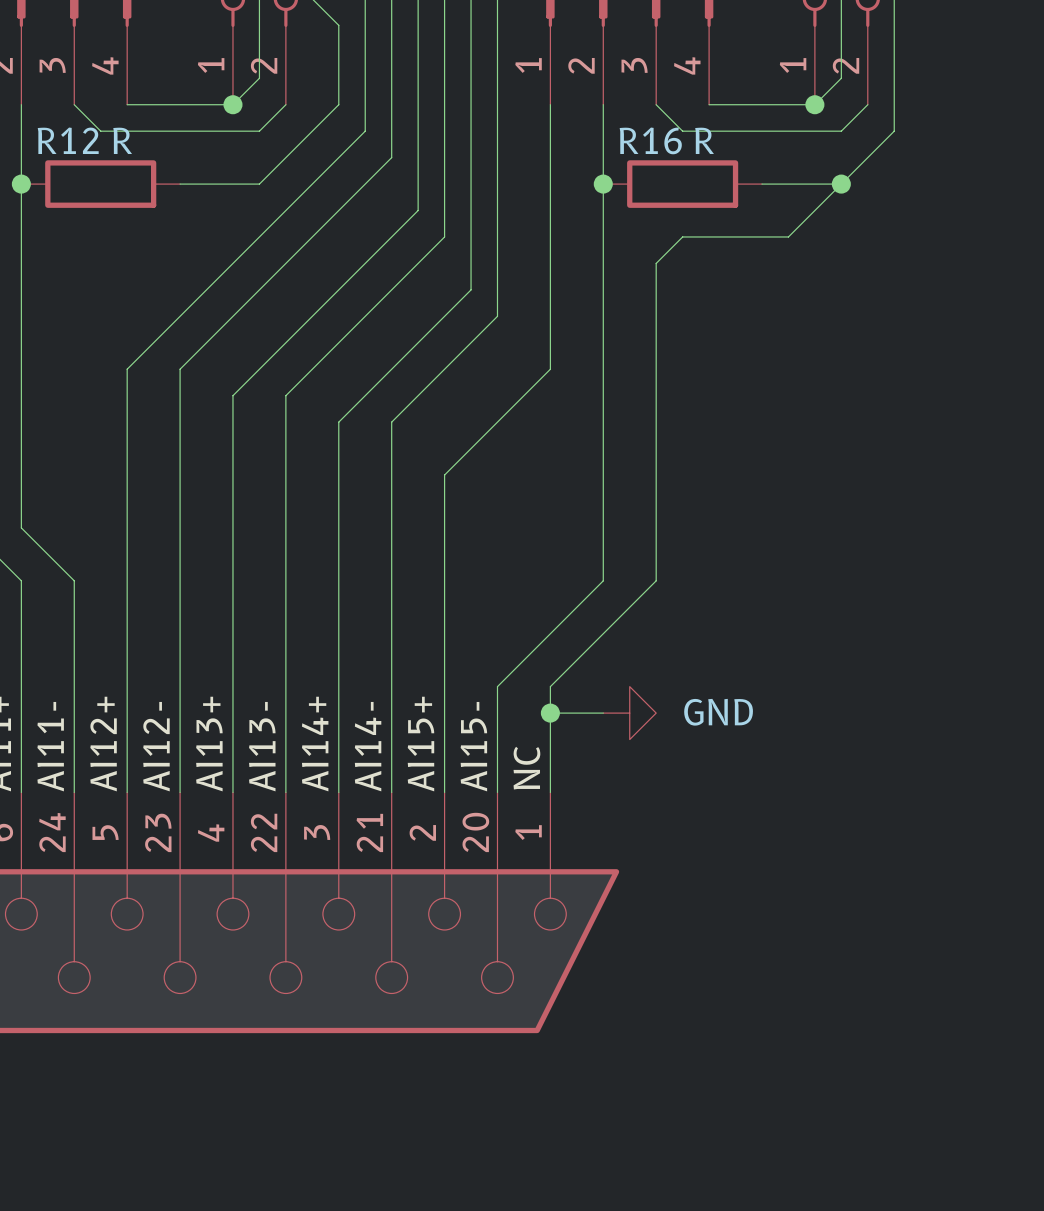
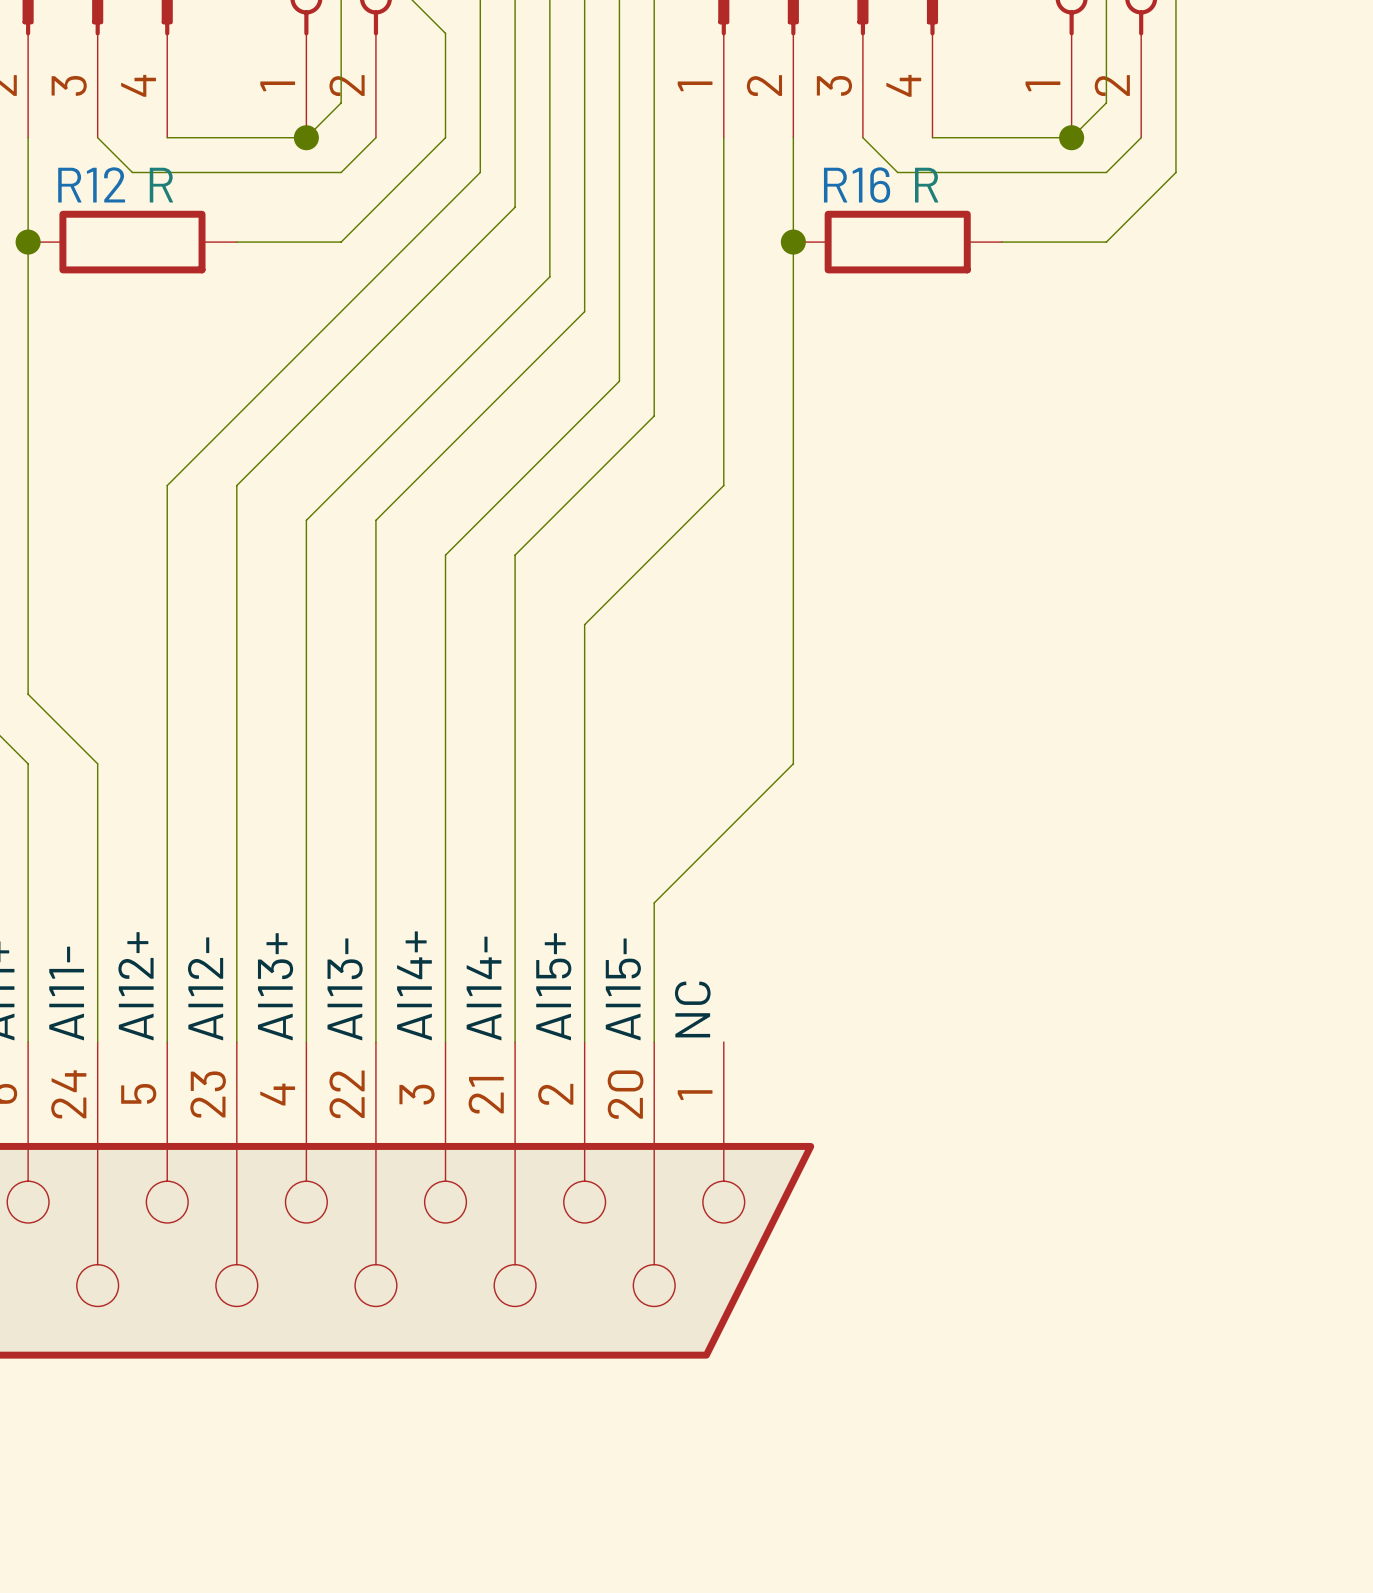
wire: (841, 184) (788, 236) (682, 236) (656, 263) (656, 580) (550, 686) (550, 792) -> none
junction: (841, 184) -> none
wire: (550, 713) (603, 713) -> none
junction: (550, 713) -> none
power symbol: GND (629, 713) -> none

